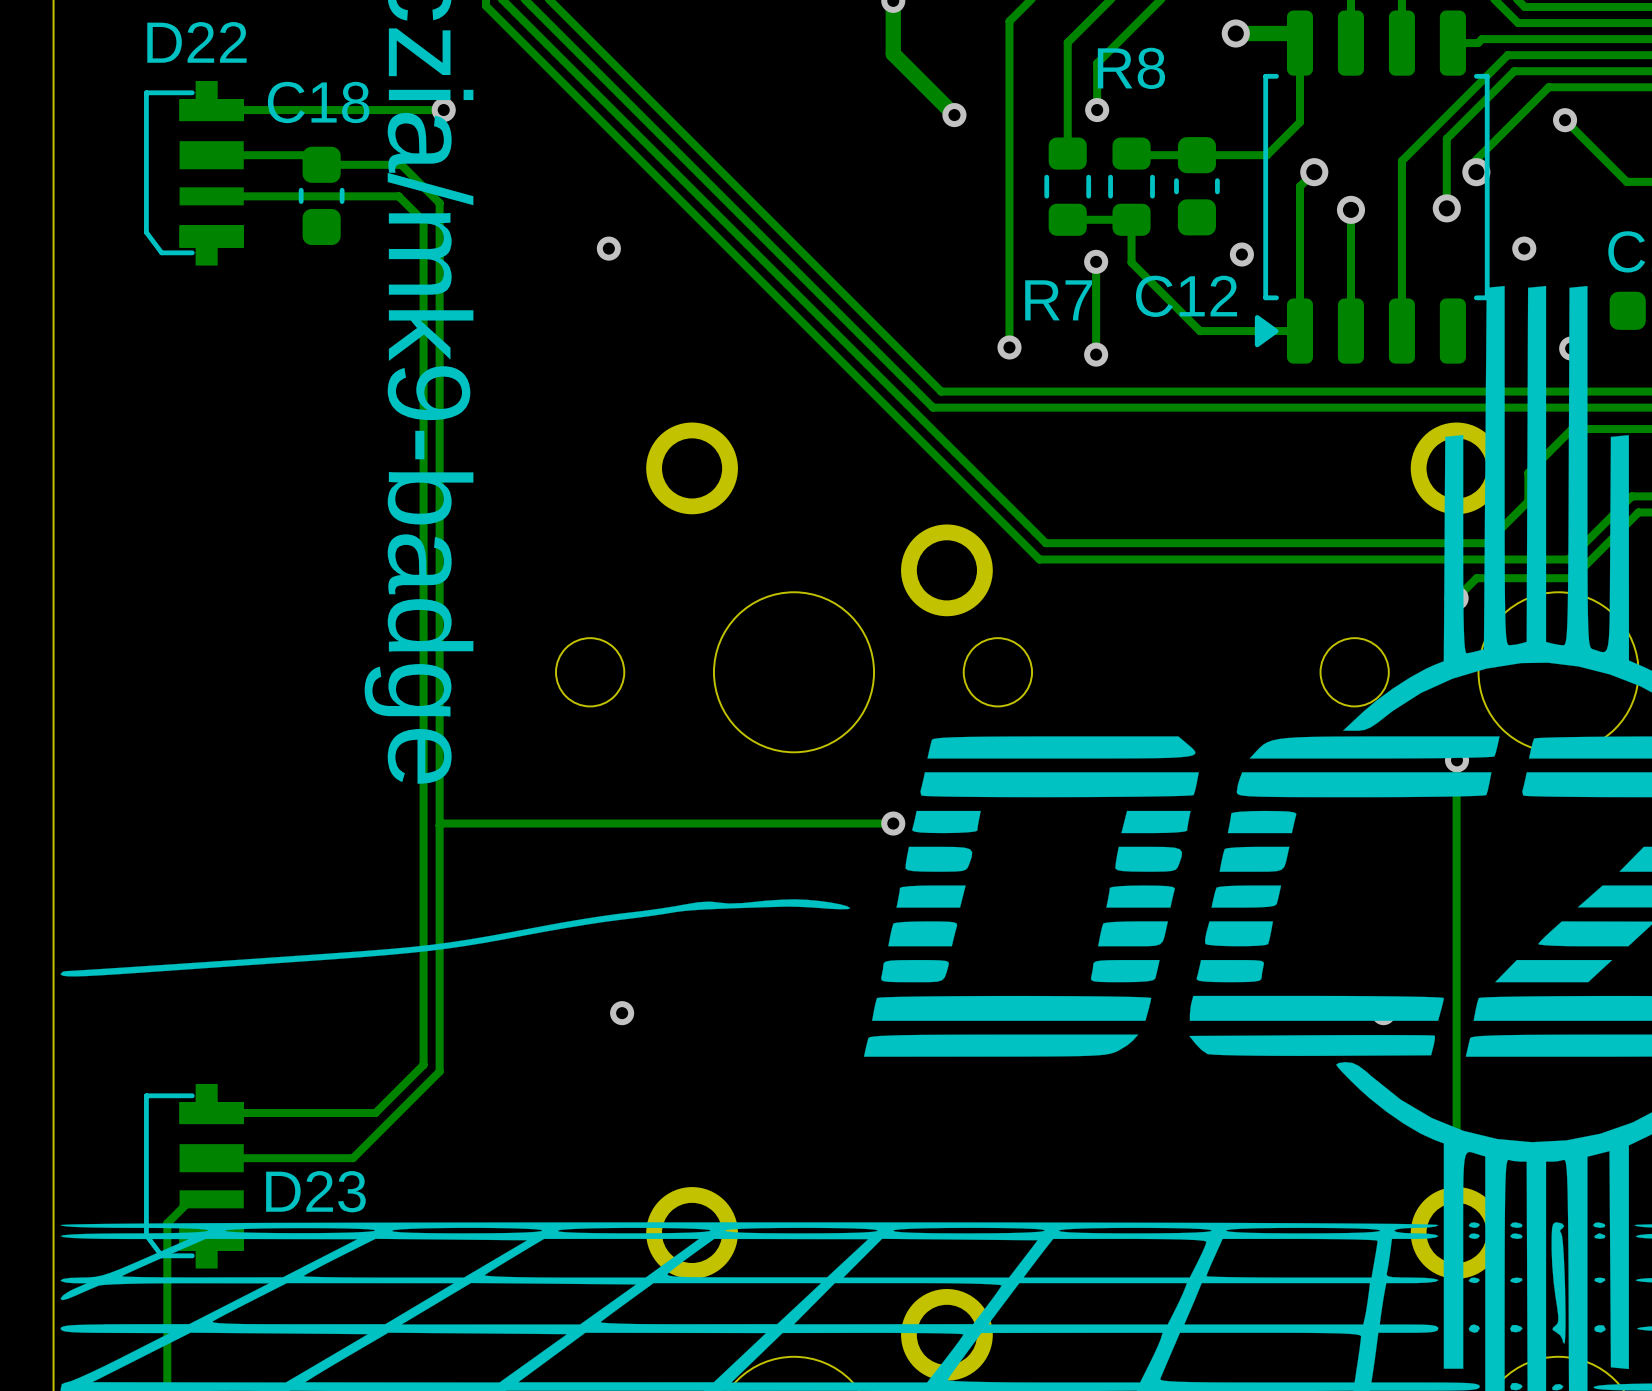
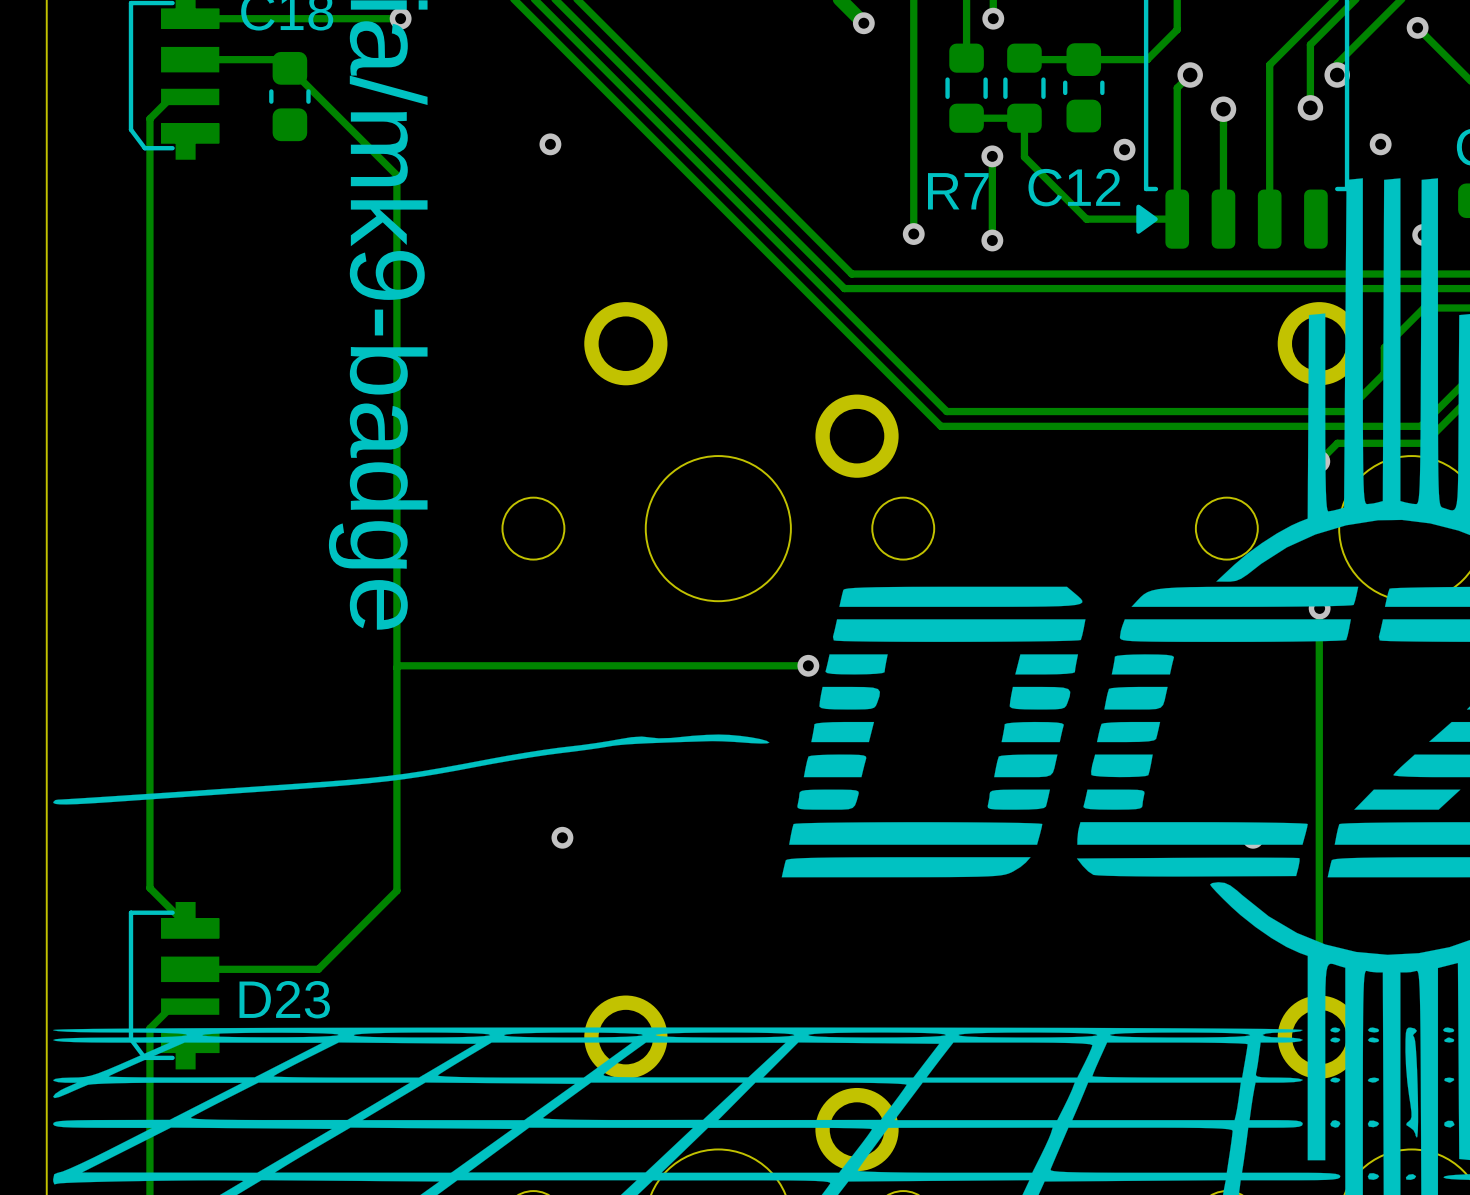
track: (321, 164) (401, 164) (439, 203) (439, 282) -> (289, 68) (396, 175)
track: (211, 196) (398, 196) (423, 221) (423, 1064) (375, 1113) (211, 1113) -> (171, 96) (149, 118) (149, 888) (190, 928)

